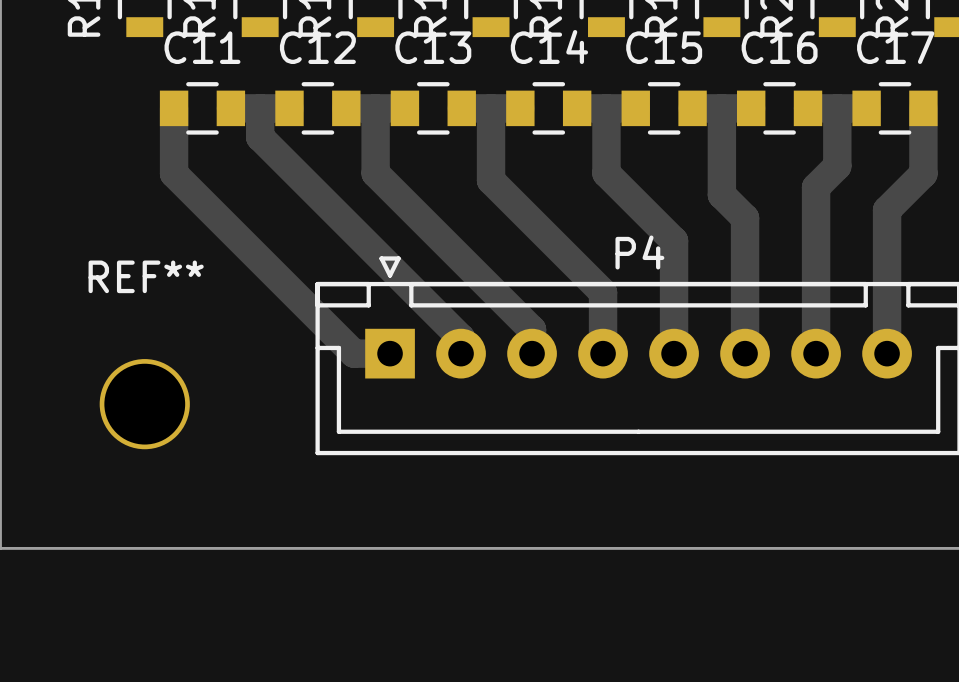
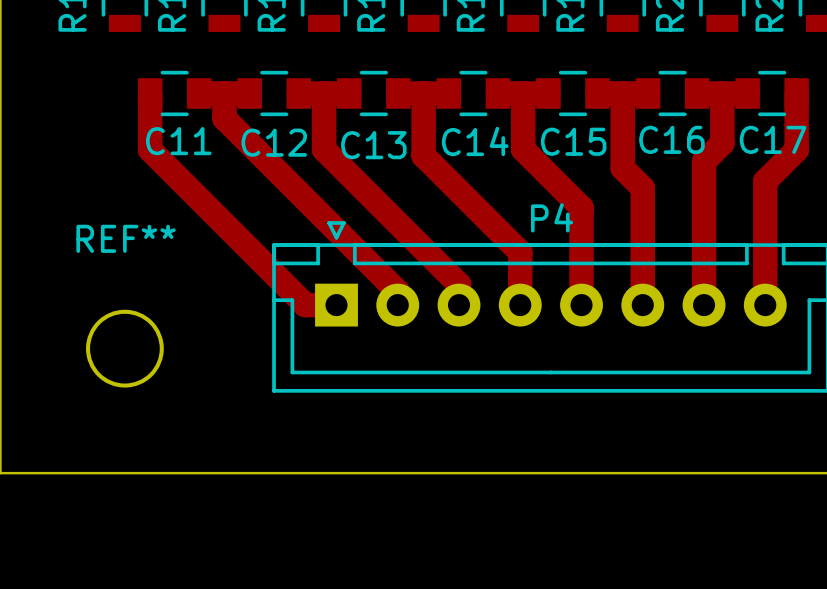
C14 name position: C14 (549, 46) -> C14 (475, 141)
C11 name position: C11 (202, 47) -> C11 (178, 141)
C12 name position: C12 (317, 47) -> C12 (274, 142)
C13 name position: C13 (433, 47) -> C13 (373, 145)
C15 name position: C15 (664, 47) -> C15 (573, 141)
C16 name position: C16 (779, 47) -> C16 (671, 139)
C17 name position: C17 (895, 47) -> C17 (773, 139)

